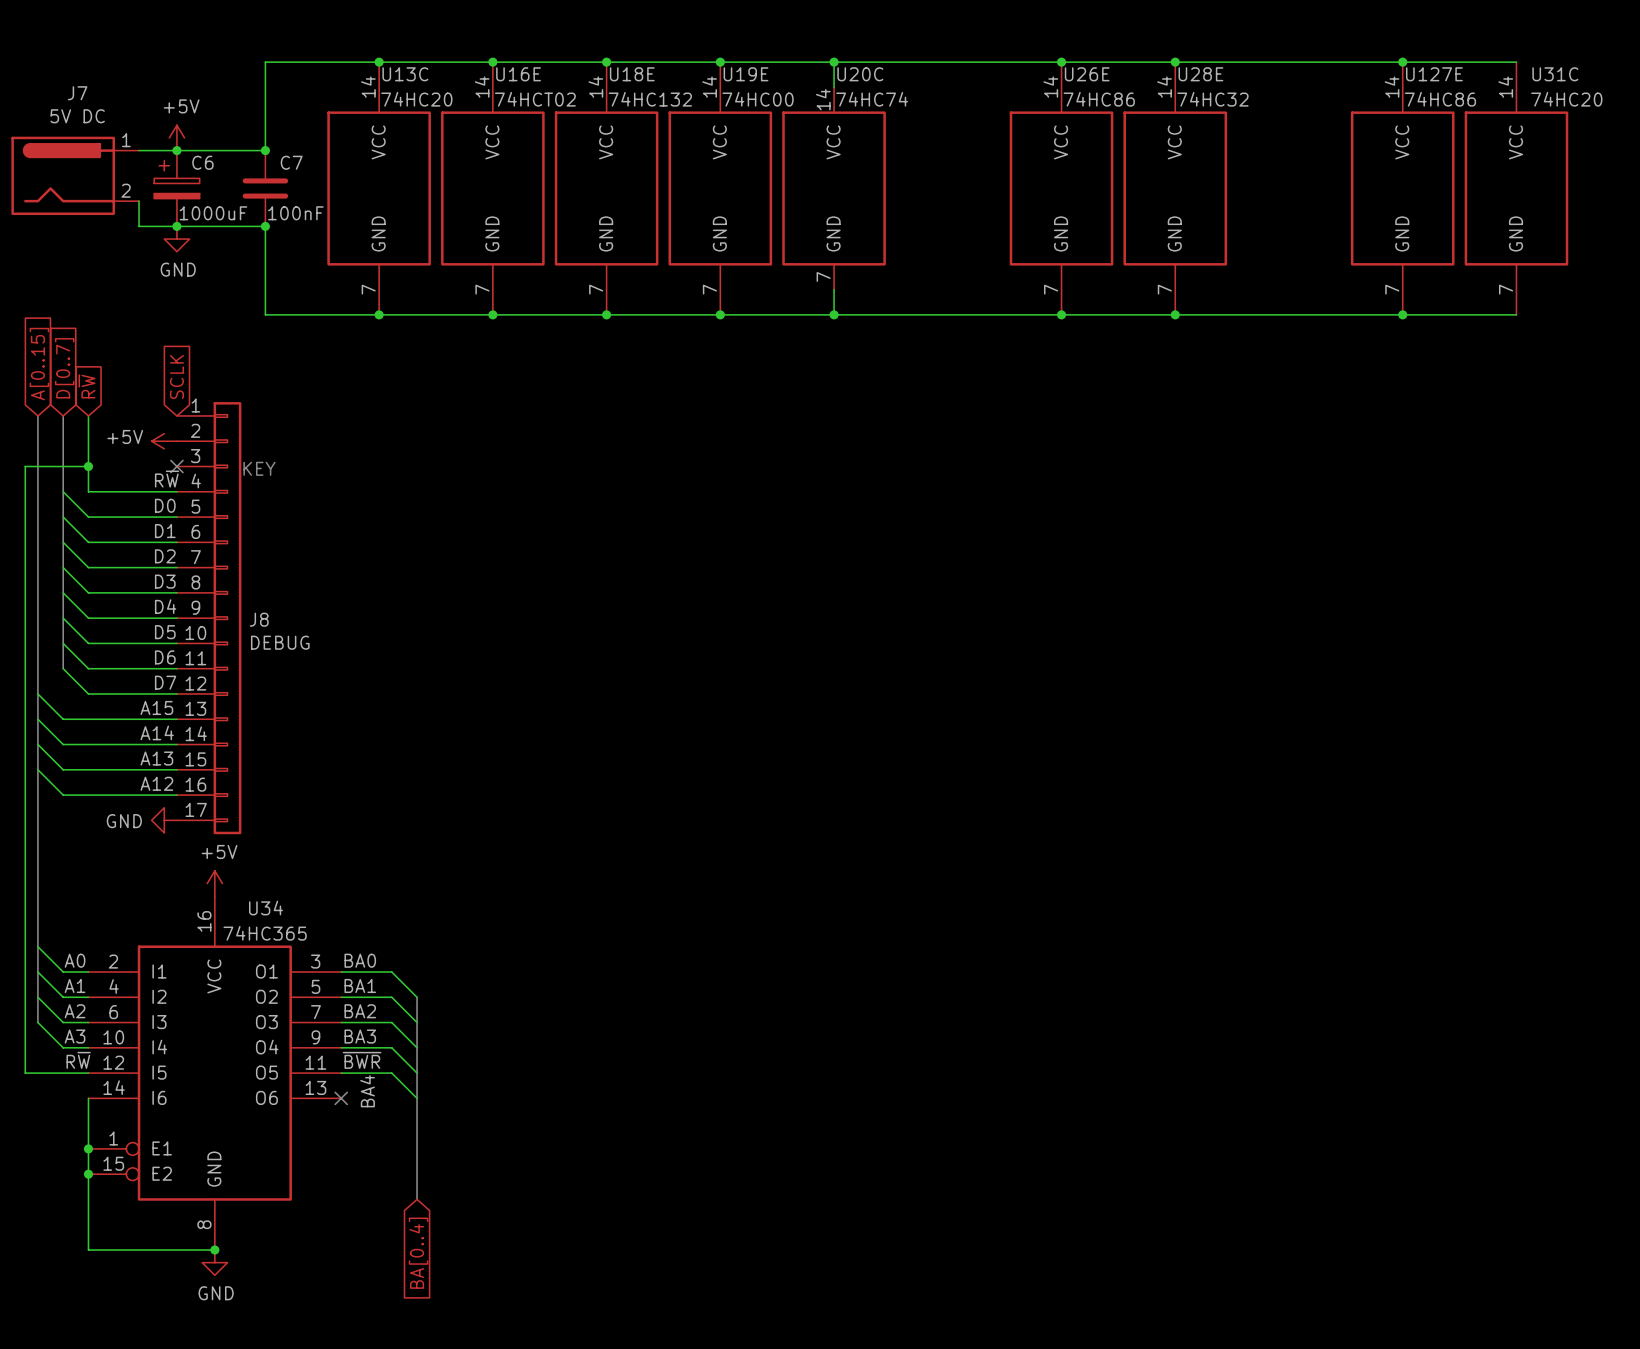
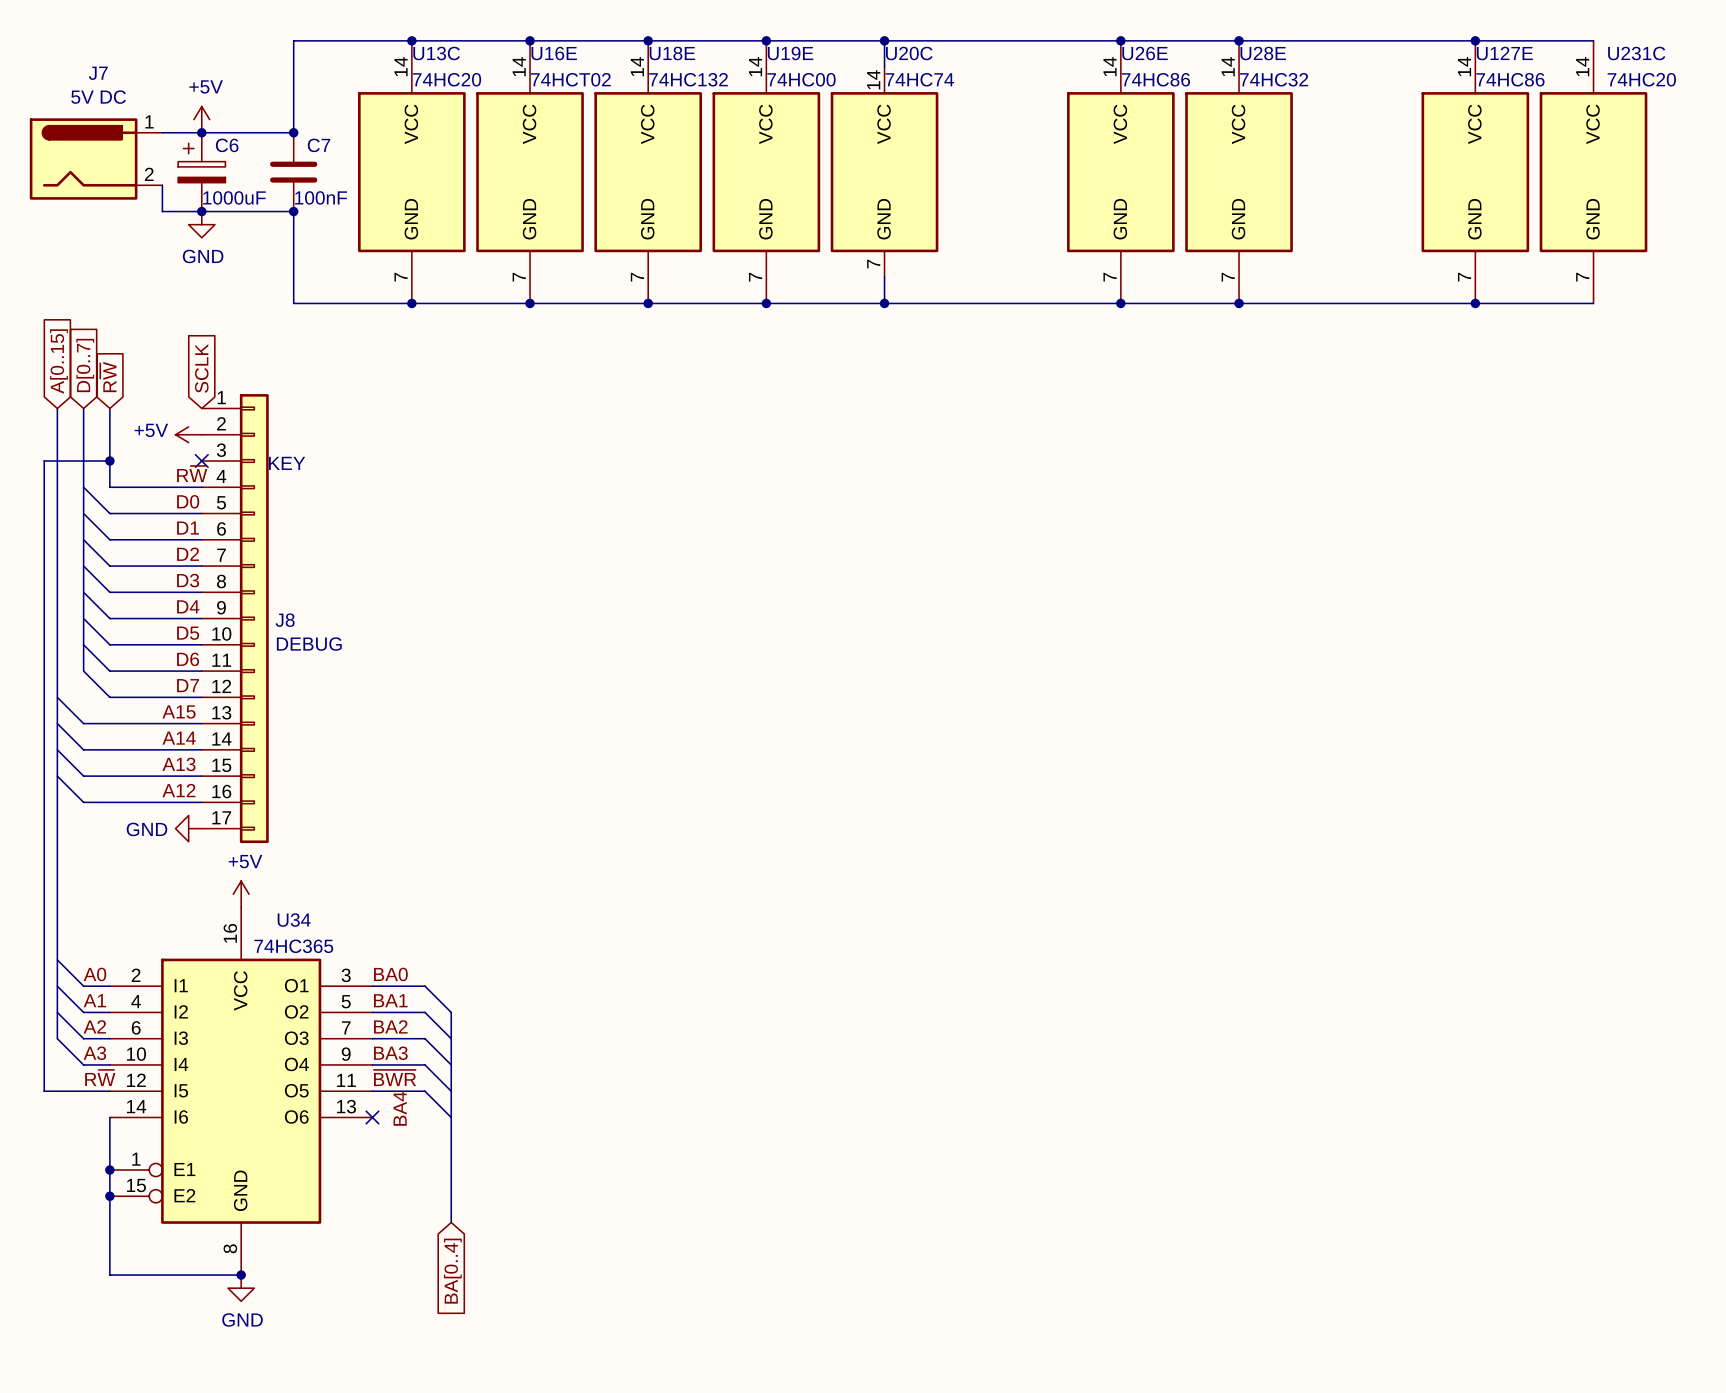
U31C name: U31C (1555, 74) -> U231C (1636, 53)

